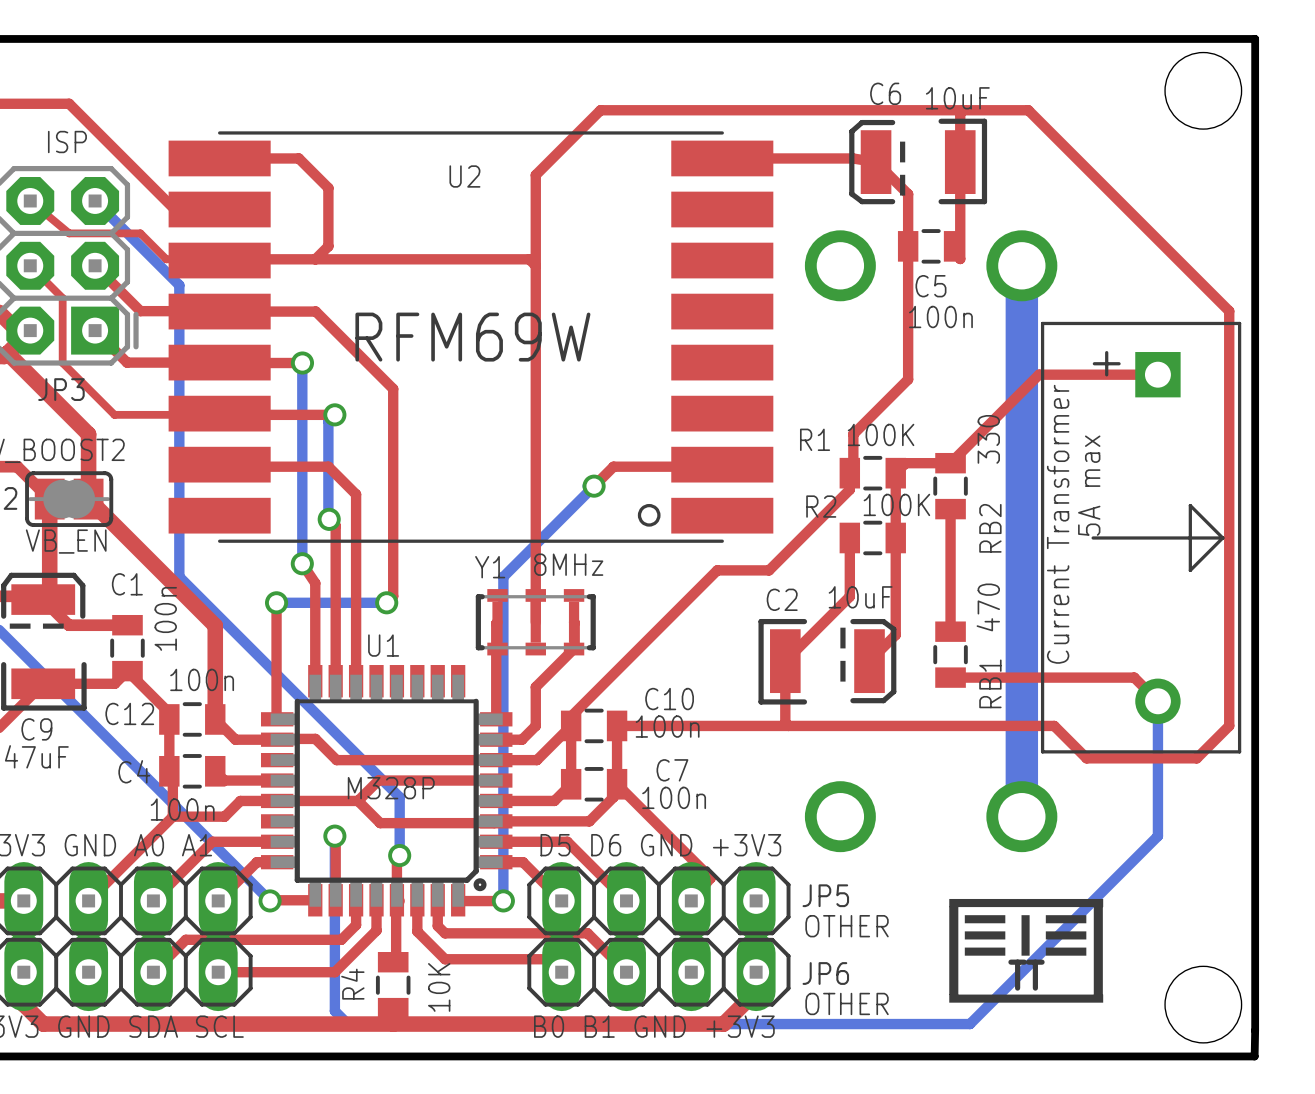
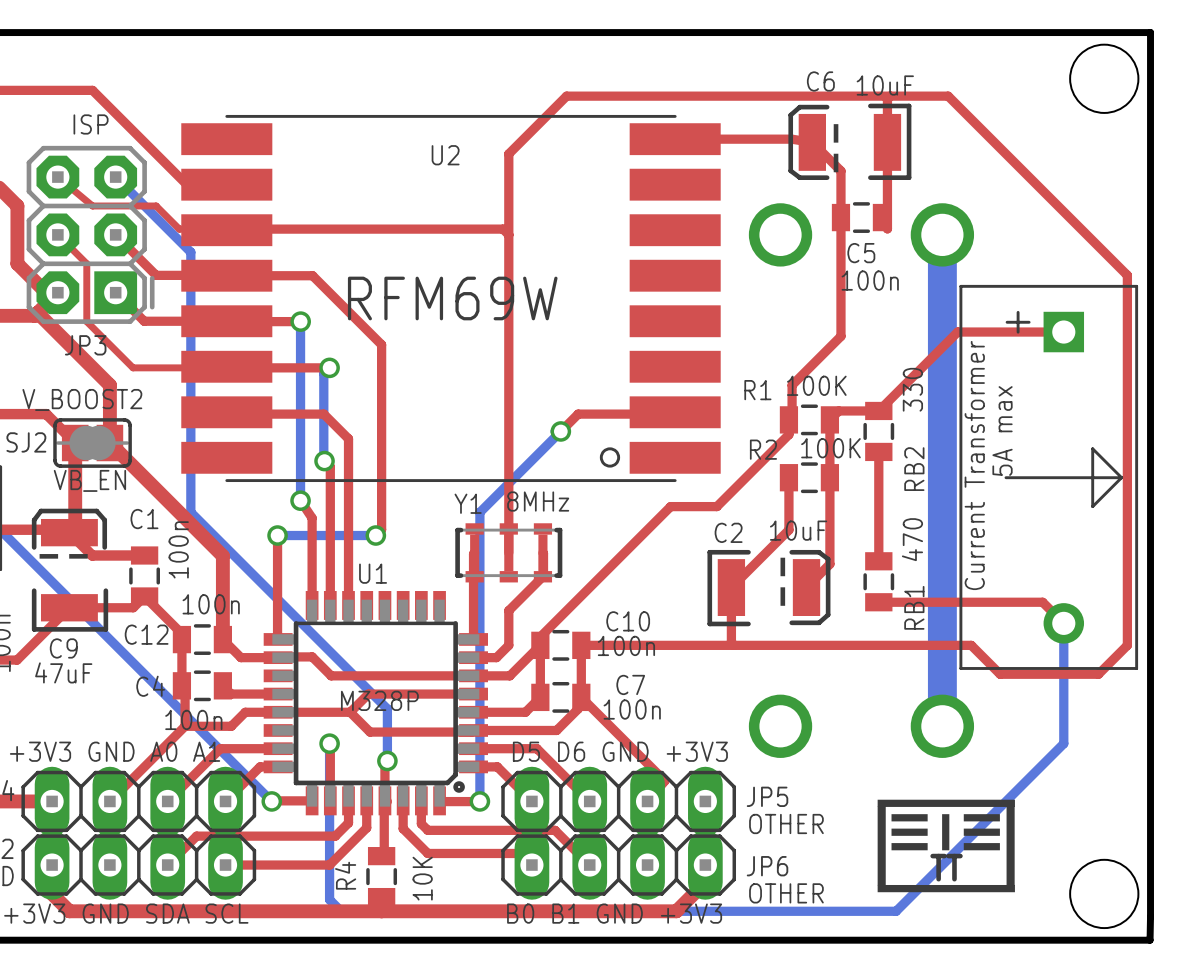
top track: (219, 158) (298, 158) (328, 188) (328, 246) (315, 259) -> none

